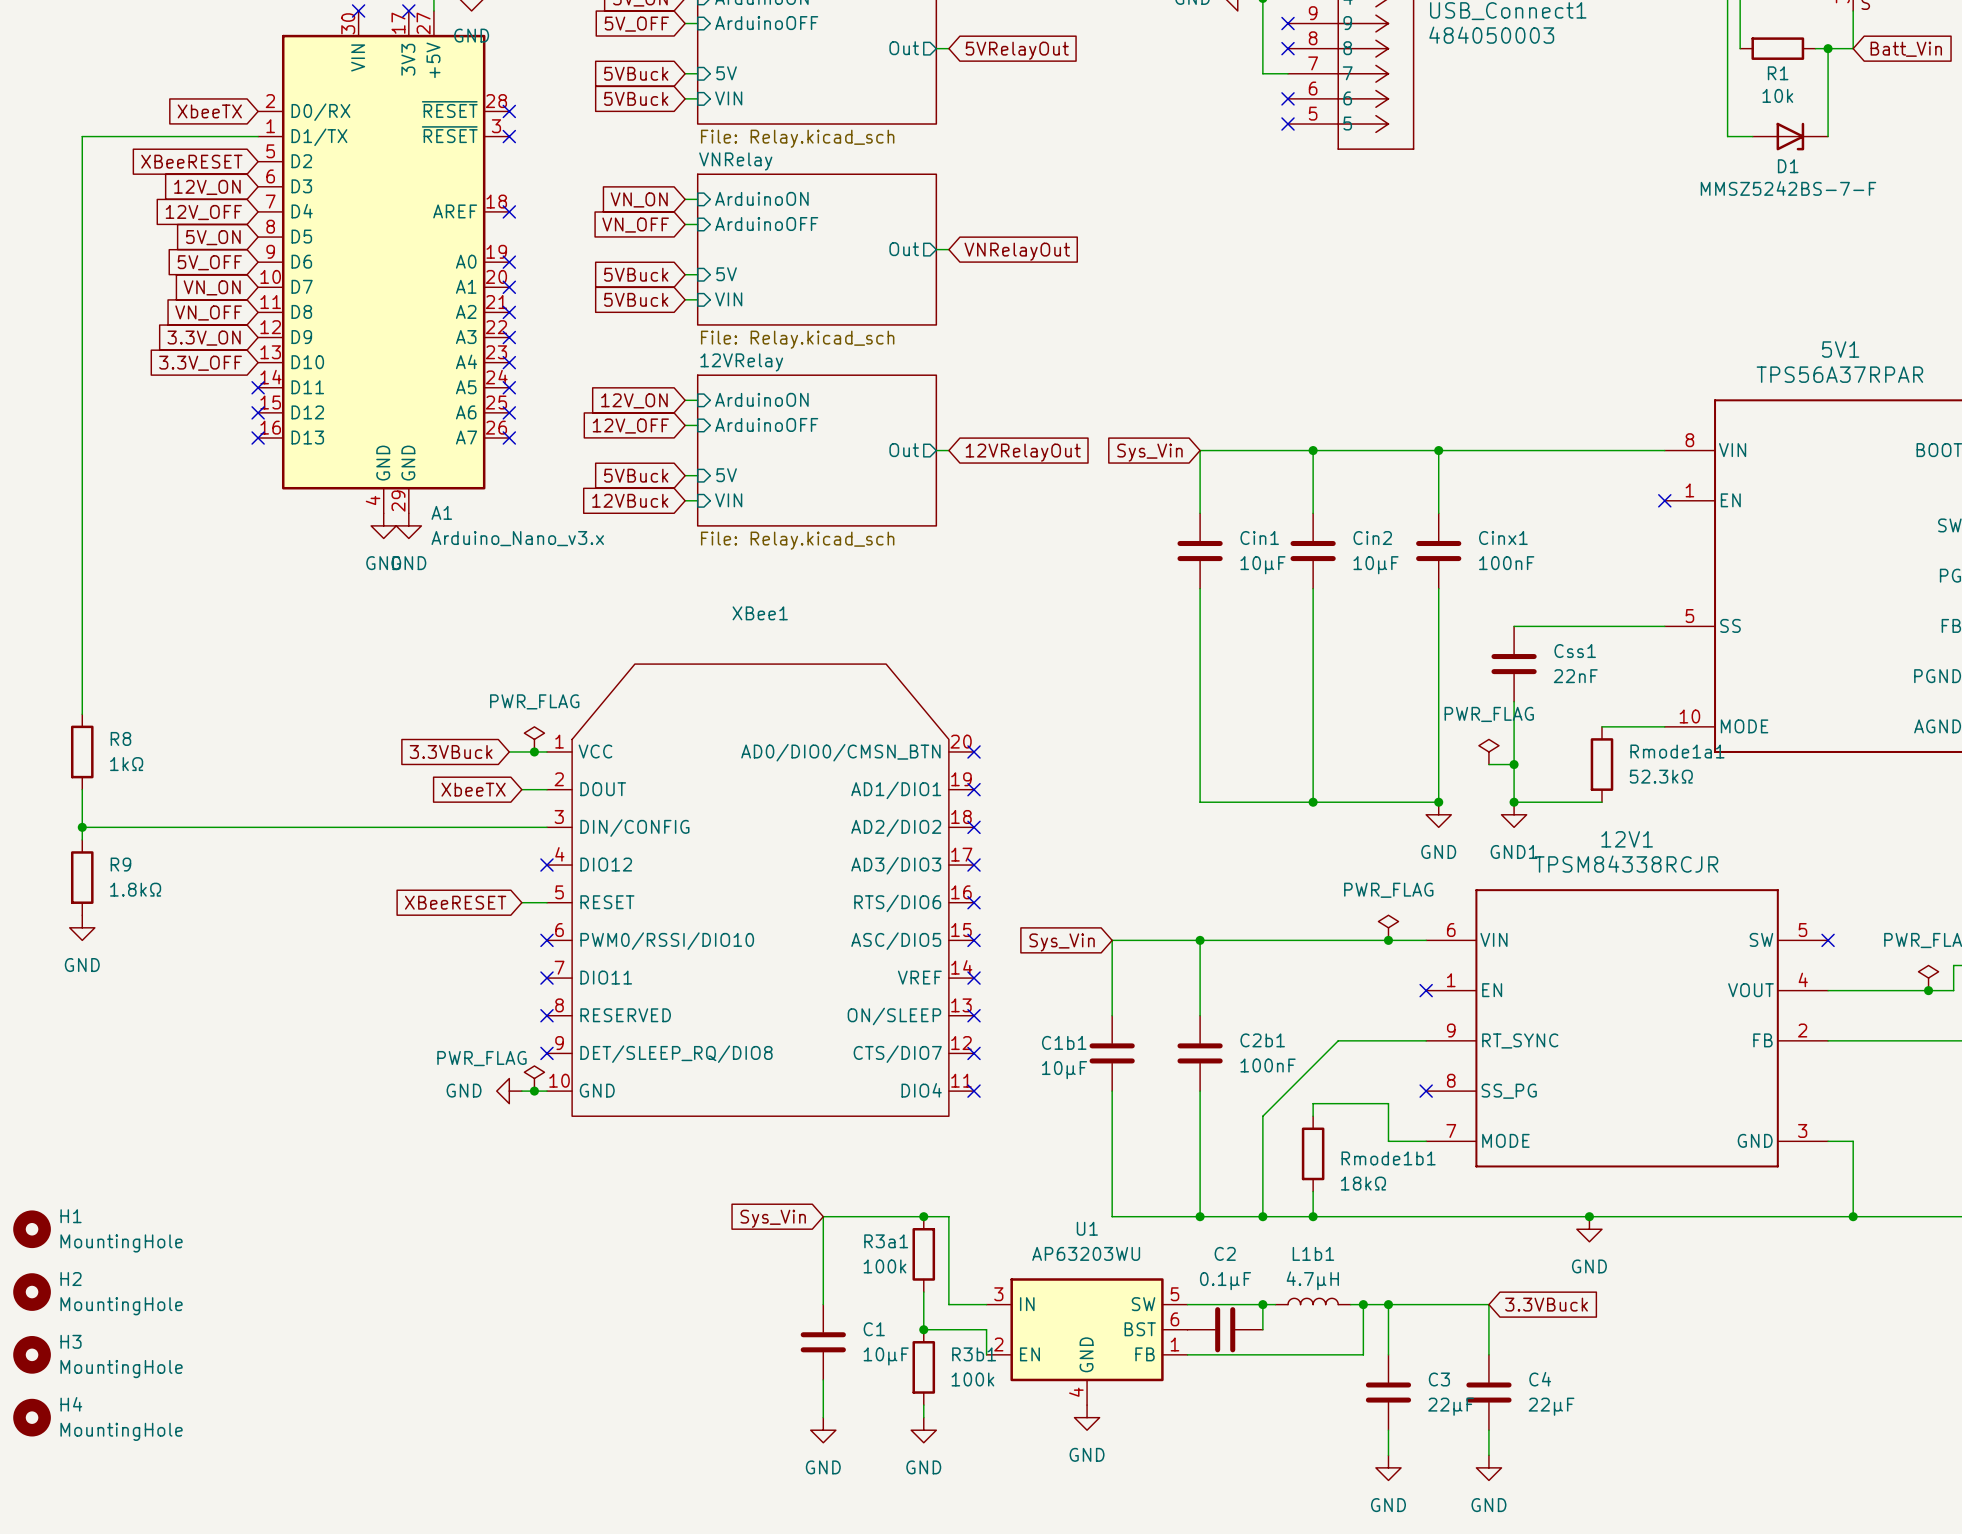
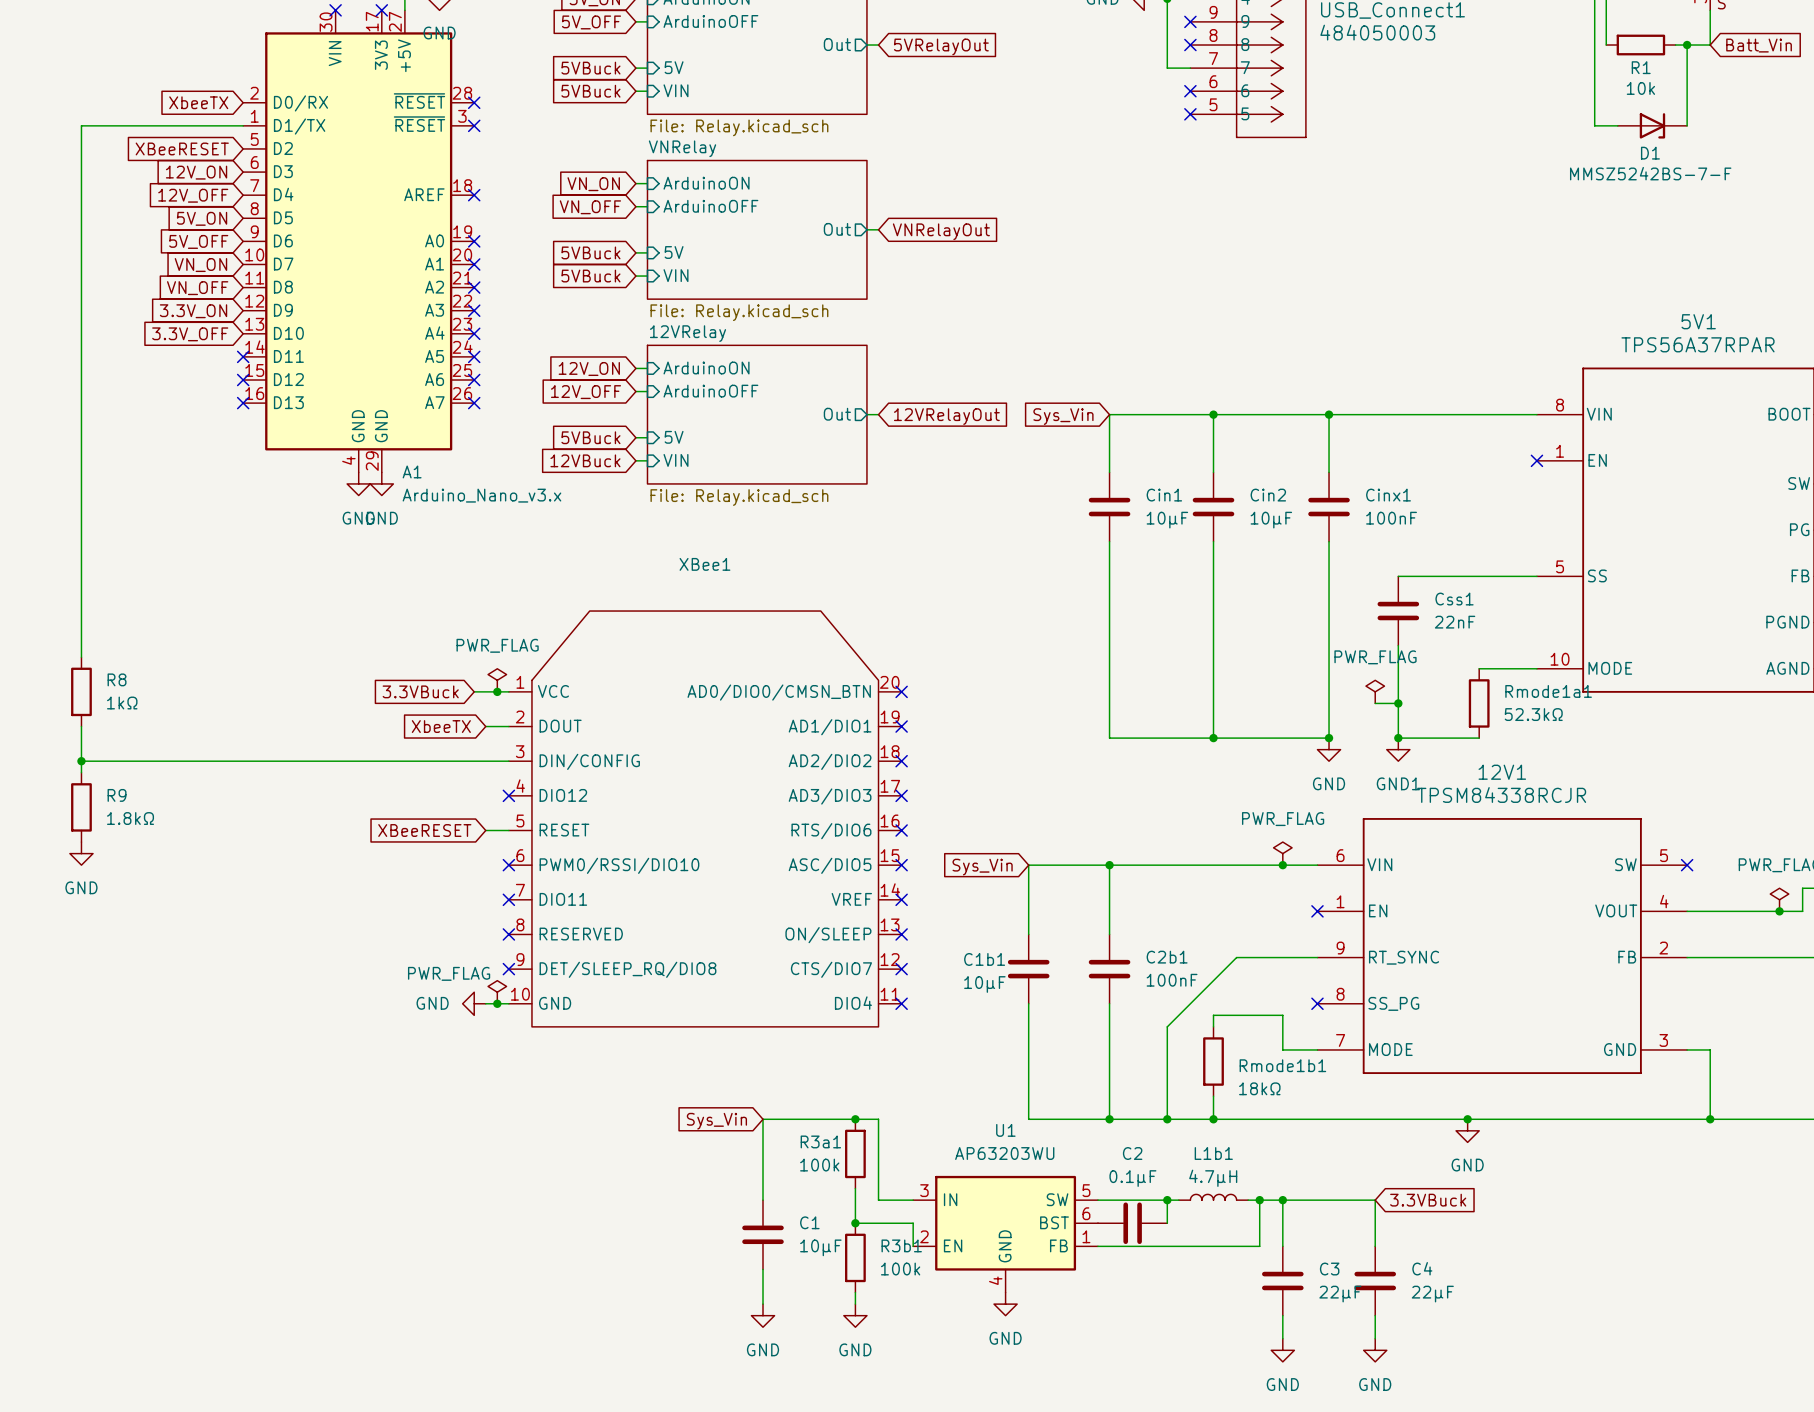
H1: MountingHole (32, 1229) -> none
H2: MountingHole (32, 1292) -> none
H3: MountingHole (32, 1354) -> none
H4: MountingHole (32, 1417) -> none

